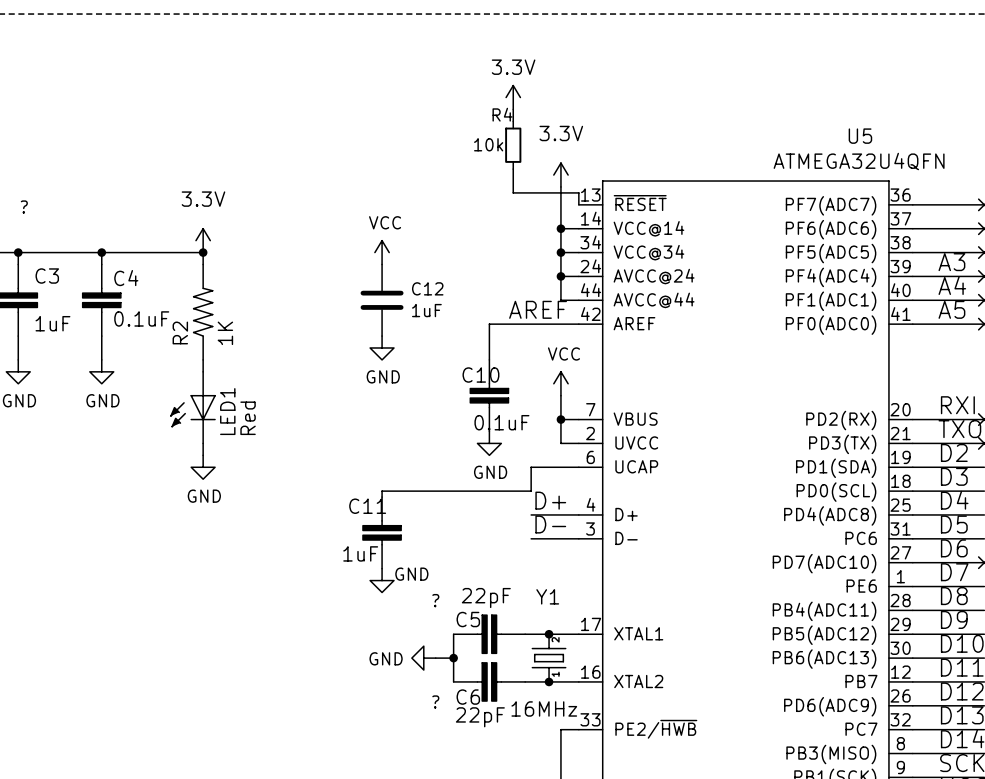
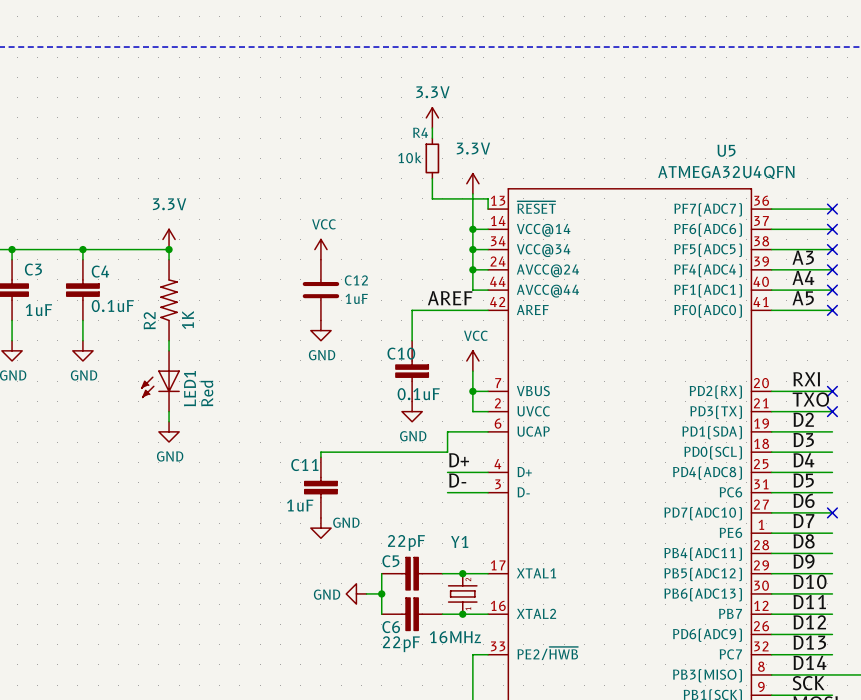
text: ? (24, 207) -> none
text: ? (435, 600) -> none
text: ? (435, 702) -> none

